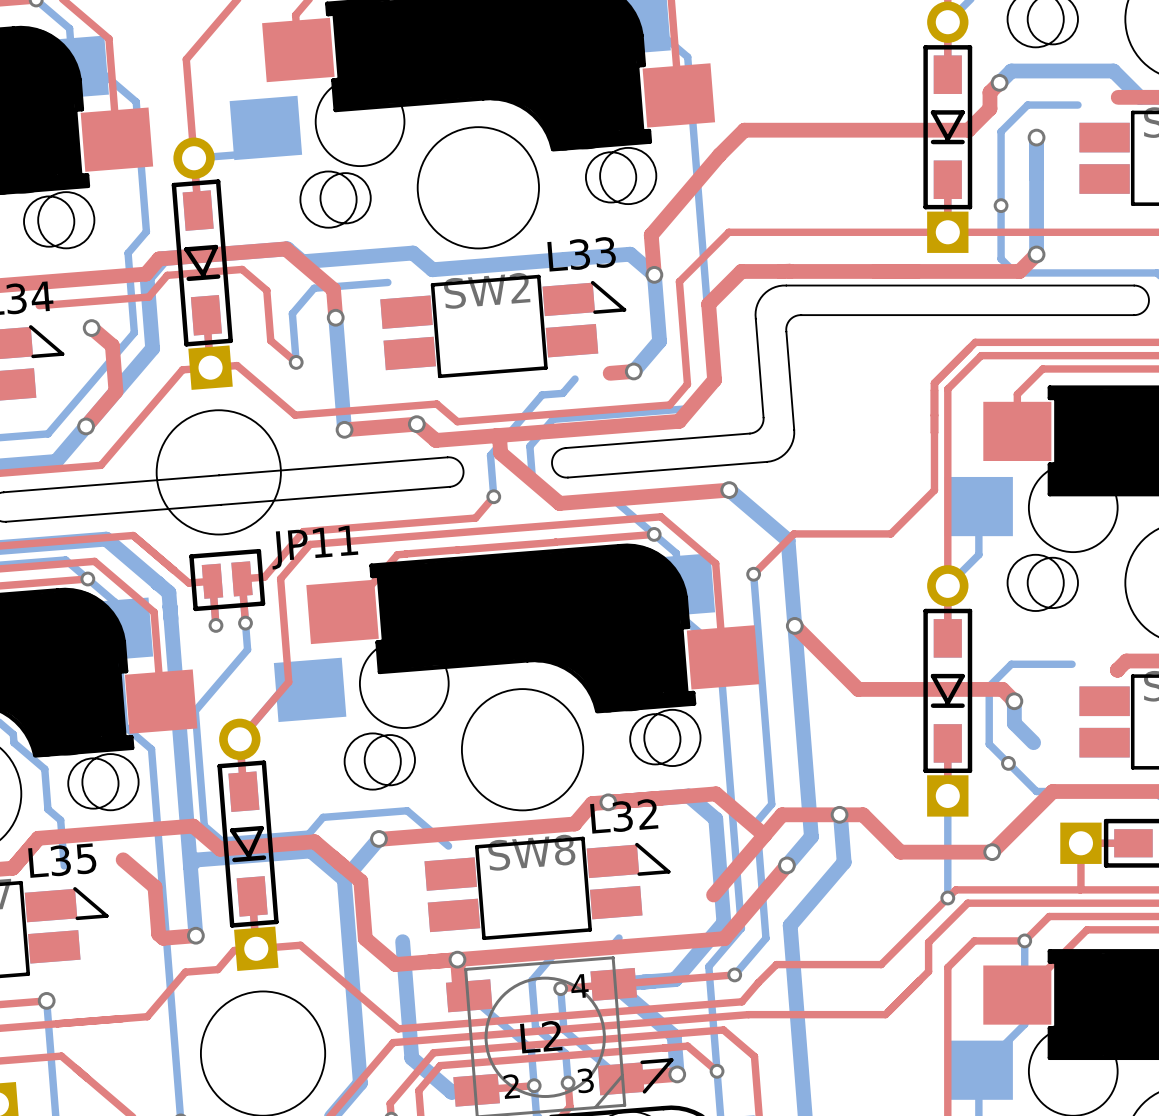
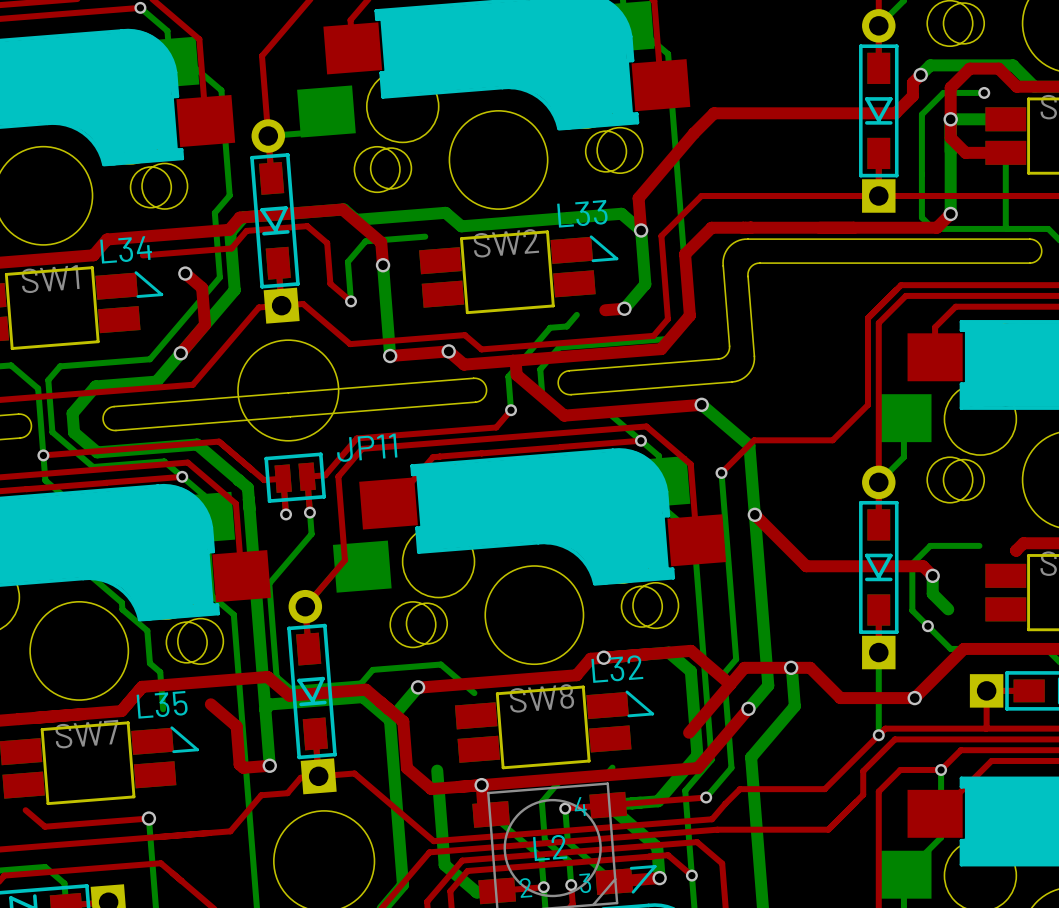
top track: none -> (1016, 86) (998, 68) (969, 68) (950, 87) (950, 137) (965, 152) (1005, 152)
bottom track: none -> (950, 119) (1005, 119)
bottom track: none -> (1005, 152) (1007, 228)
via position: (1001, 205) -> (984, 92)

